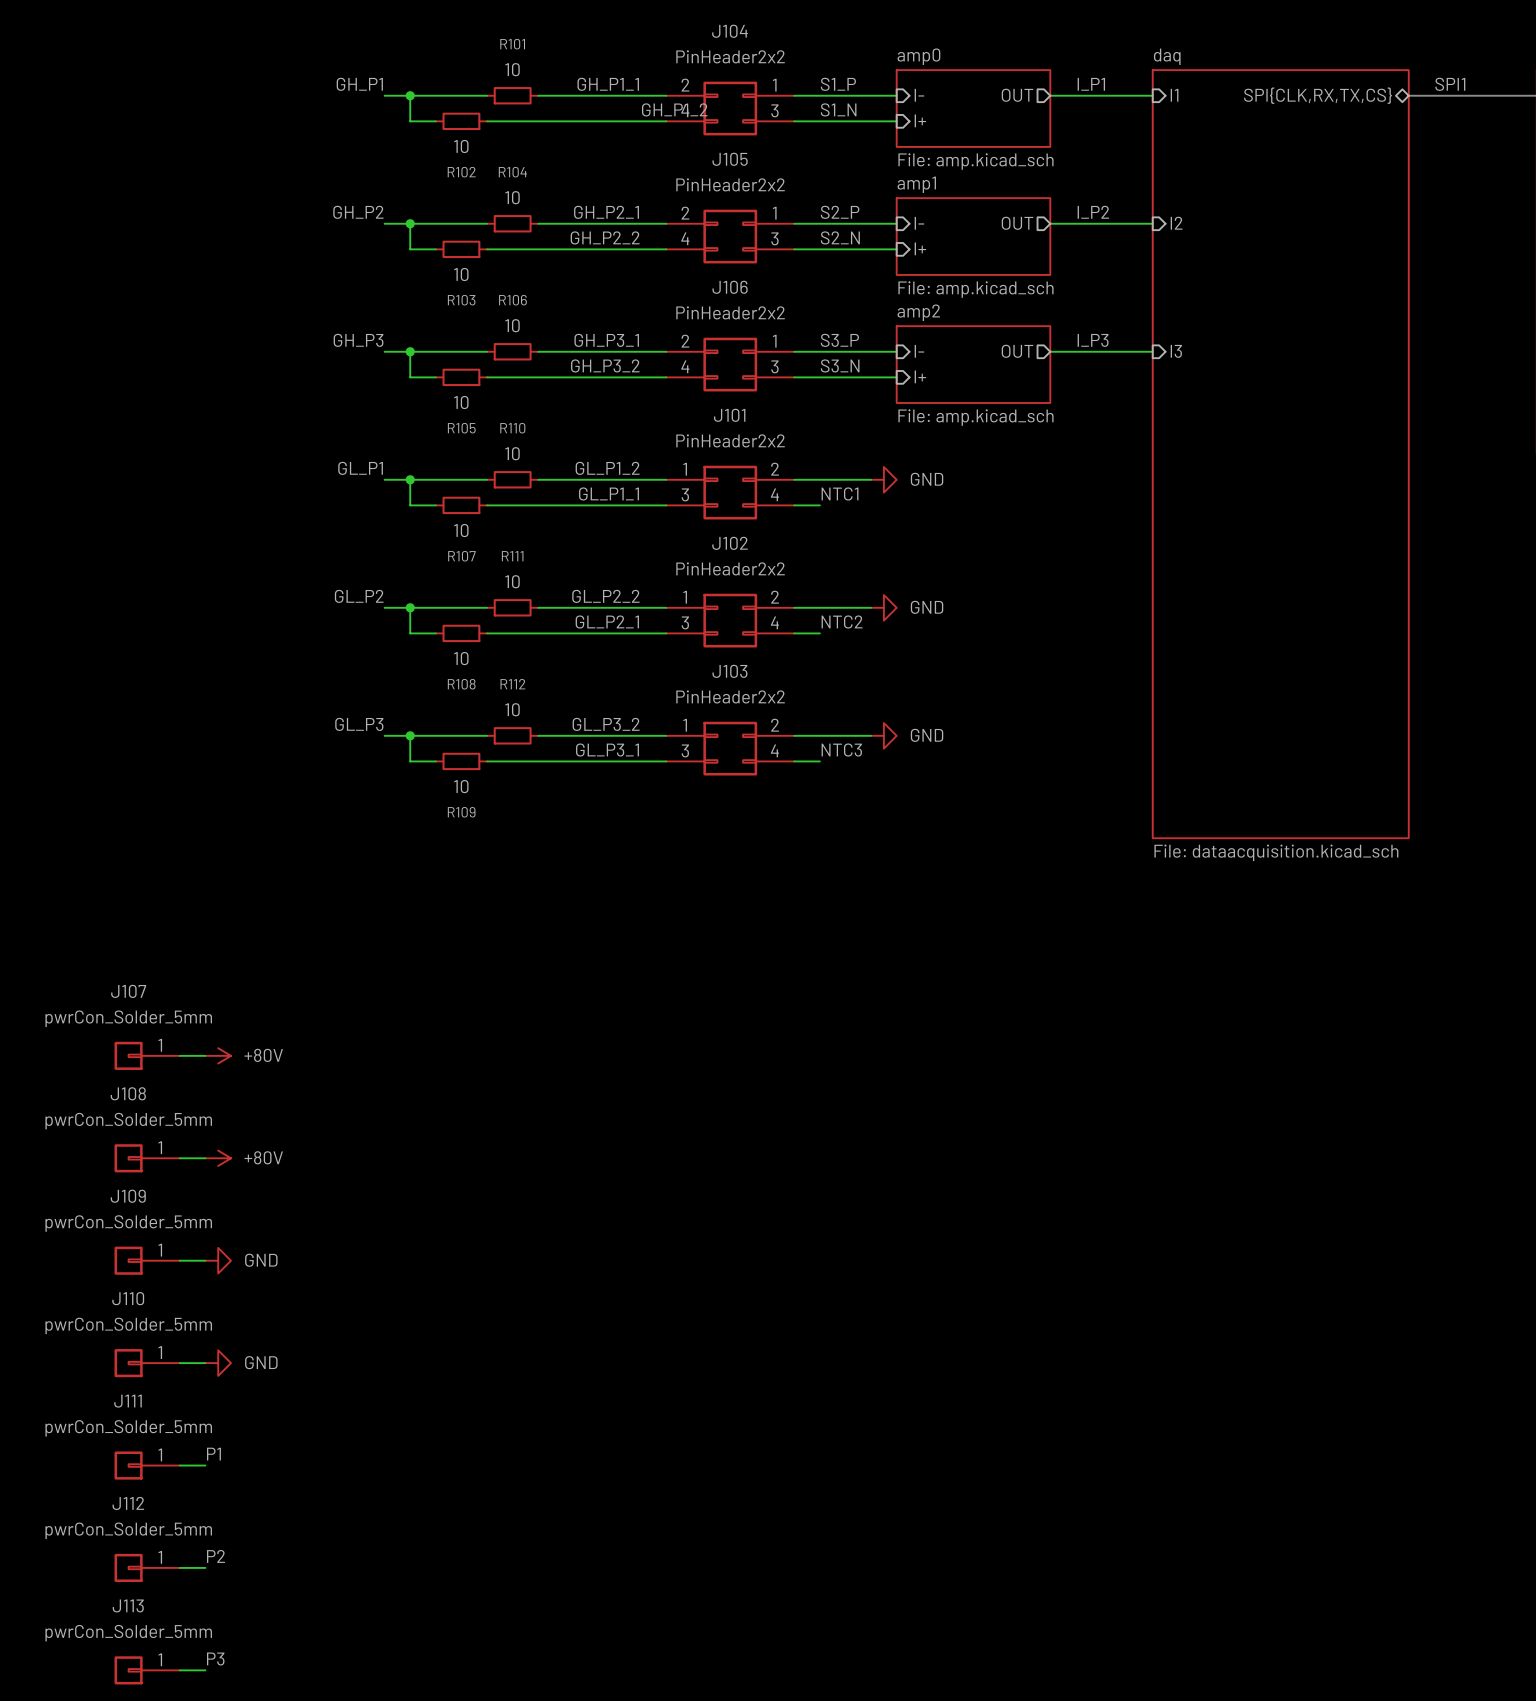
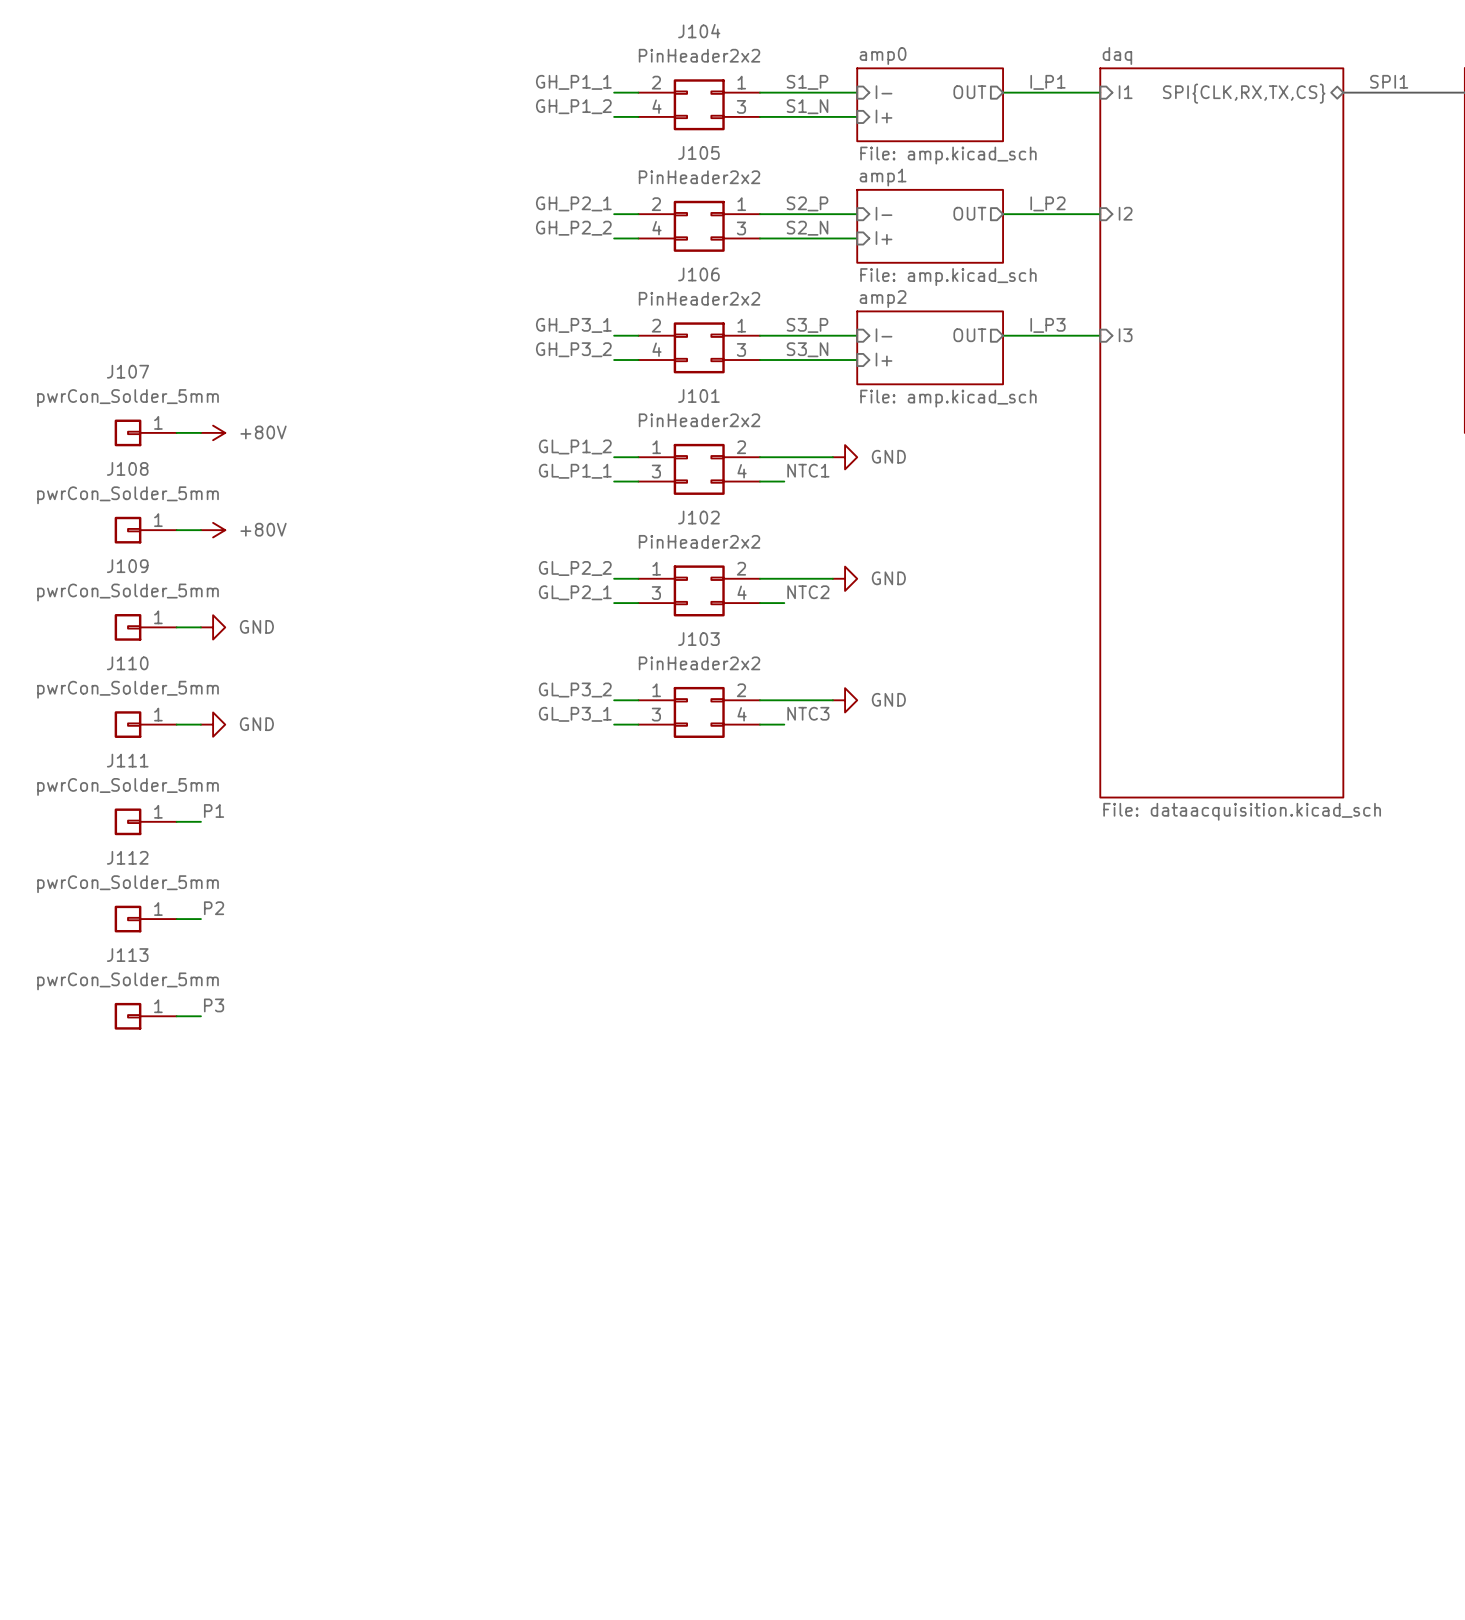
label: GH_P1 (359, 84) -> none
wire: (384, 95) (487, 95) -> none
wire: (410, 95) (410, 121) (435, 121) -> none
junction: (410, 95) -> none
R101: 10 (512, 95) -> none
wire: (538, 95) (640, 95) -> none
label position: GH_P1_2 (674, 109) -> GH_P1_2 (573, 106)
R102: 10 (461, 121) -> none
wire: (487, 121) (640, 121) -> none
label: GH_P2 (358, 212) -> none
wire: (384, 223) (487, 223) -> none
wire: (410, 223) (410, 249) (435, 249) -> none
junction: (410, 223) -> none
R104: 10 (512, 223) -> none
wire: (538, 223) (640, 223) -> none
R103: 10 (461, 249) -> none
wire: (487, 249) (640, 249) -> none
label: GH_P3 (358, 340) -> none
wire: (384, 351) (487, 351) -> none
wire: (410, 351) (410, 377) (435, 377) -> none
junction: (410, 351) -> none
R106: 10 (512, 351) -> none
wire: (538, 351) (640, 351) -> none
R105: 10 (461, 377) -> none
wire: (487, 377) (640, 377) -> none
wire: none -> (176, 432) (200, 432)
power symbol: none -> +80V (213, 432)
label: GL_P1 (360, 468) -> none
wire: (384, 479) (487, 479) -> none
wire: (410, 479) (410, 505) (435, 505) -> none
junction: (410, 479) -> none
R110: 10 (512, 479) -> none
wire: (538, 479) (640, 479) -> none
R107: 10 (461, 505) -> none
wire: (487, 505) (640, 505) -> none
wire: none -> (176, 530) (200, 530)
power symbol: none -> +80V (213, 530)
label: GL_P2 (359, 596) -> none
wire: (384, 607) (487, 607) -> none
wire: (410, 607) (410, 633) (435, 633) -> none
junction: (410, 607) -> none
R111: 10 (512, 607) -> none
wire: (538, 607) (640, 607) -> none
R108: 10 (461, 633) -> none
wire: (487, 633) (640, 633) -> none
wire: none -> (176, 627) (200, 627)
power symbol: none -> GND (213, 627)
label: GL_P3 (359, 724) -> none
wire: (384, 735) (487, 735) -> none
wire: (410, 735) (410, 761) (435, 761) -> none
junction: (410, 735) -> none
R112: 10 (512, 735) -> none
wire: (538, 735) (640, 735) -> none
wire: none -> (176, 724) (200, 724)
power symbol: none -> GND (213, 724)
R109: 10 (461, 761) -> none
wire: (487, 761) (640, 761) -> none
label: none -> P1 (214, 810)
label: none -> P2 (214, 908)
J107 position: (147, 1055) -> (145, 432)
wire: (179, 1055) (205, 1055) -> (176, 821) (200, 821)
power symbol: +80V (218, 1055) -> none
label: none -> P3 (214, 1005)
J108 position: (147, 1158) -> (145, 530)
wire: (179, 1158) (205, 1158) -> (176, 919) (200, 919)
power symbol: +80V (218, 1158) -> none
J109 position: (147, 1260) -> (145, 627)
wire: (179, 1260) (205, 1260) -> (176, 1016) (200, 1016)
power symbol: GND (218, 1260) -> none
J110 position: (147, 1363) -> (145, 724)
wire: (179, 1363) (205, 1363) -> none
power symbol: GND (218, 1363) -> none
label: P1 (213, 1454) -> none
J111 position: (147, 1465) -> (145, 821)
wire: (179, 1465) (205, 1465) -> none
label: P2 (215, 1556) -> none
J112 position: (147, 1567) -> (145, 919)
wire: (179, 1567) (205, 1567) -> none
label: P3 (215, 1659) -> none
J113 position: (147, 1670) -> (145, 1016)
wire: (179, 1670) (205, 1670) -> none

